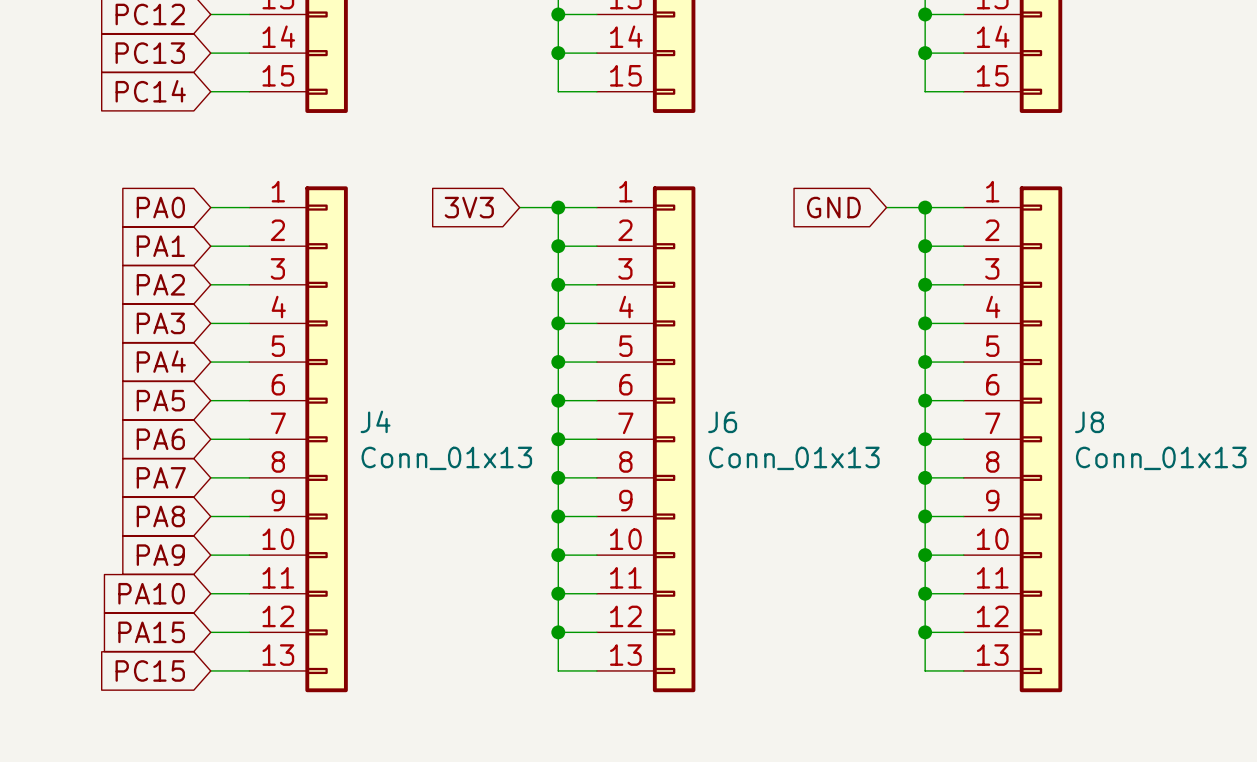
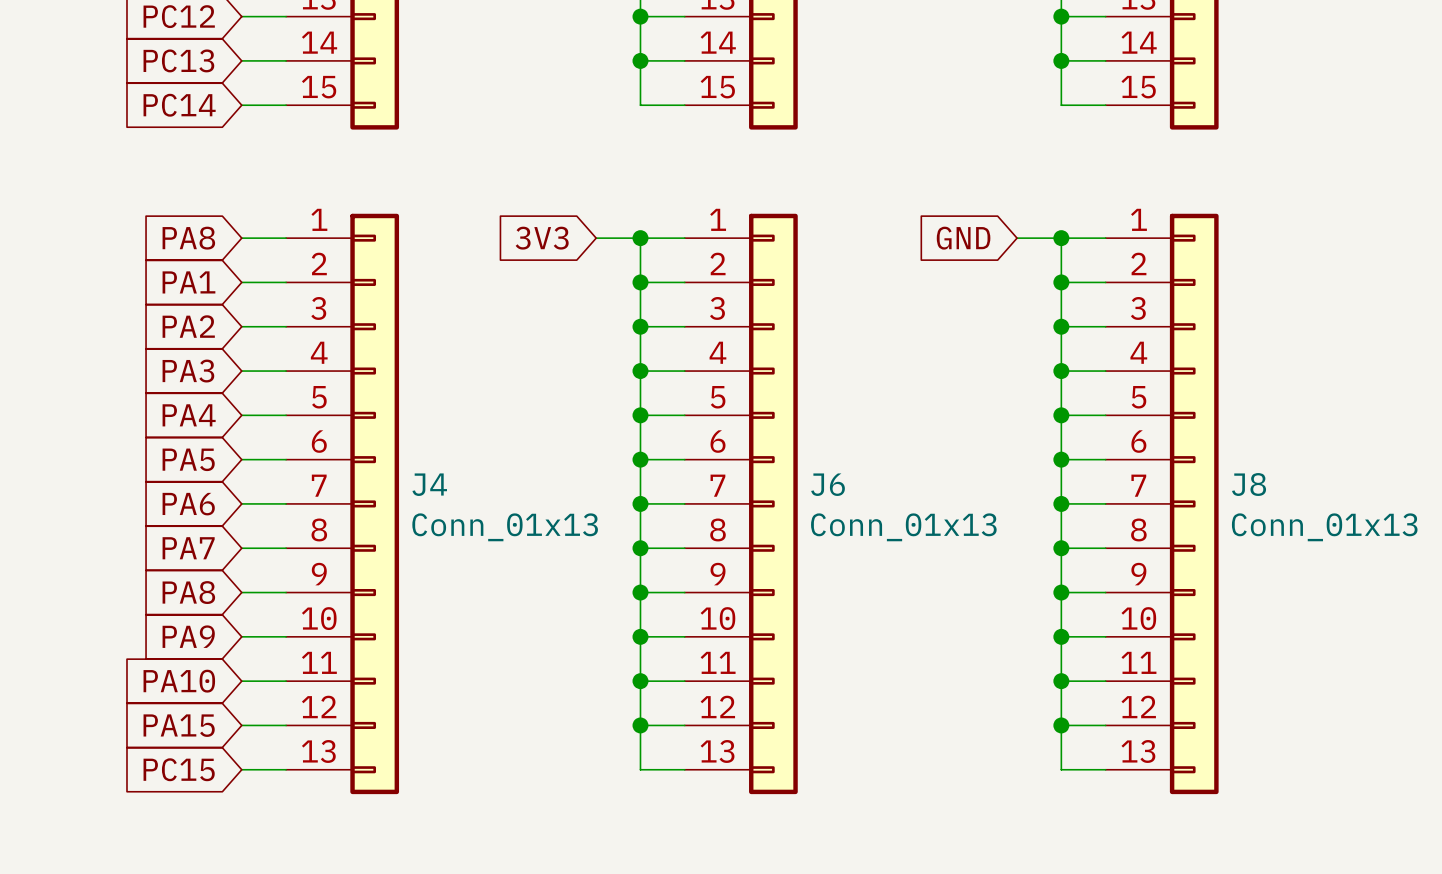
global label: PA0 (160, 207) -> PA8 (188, 238)

